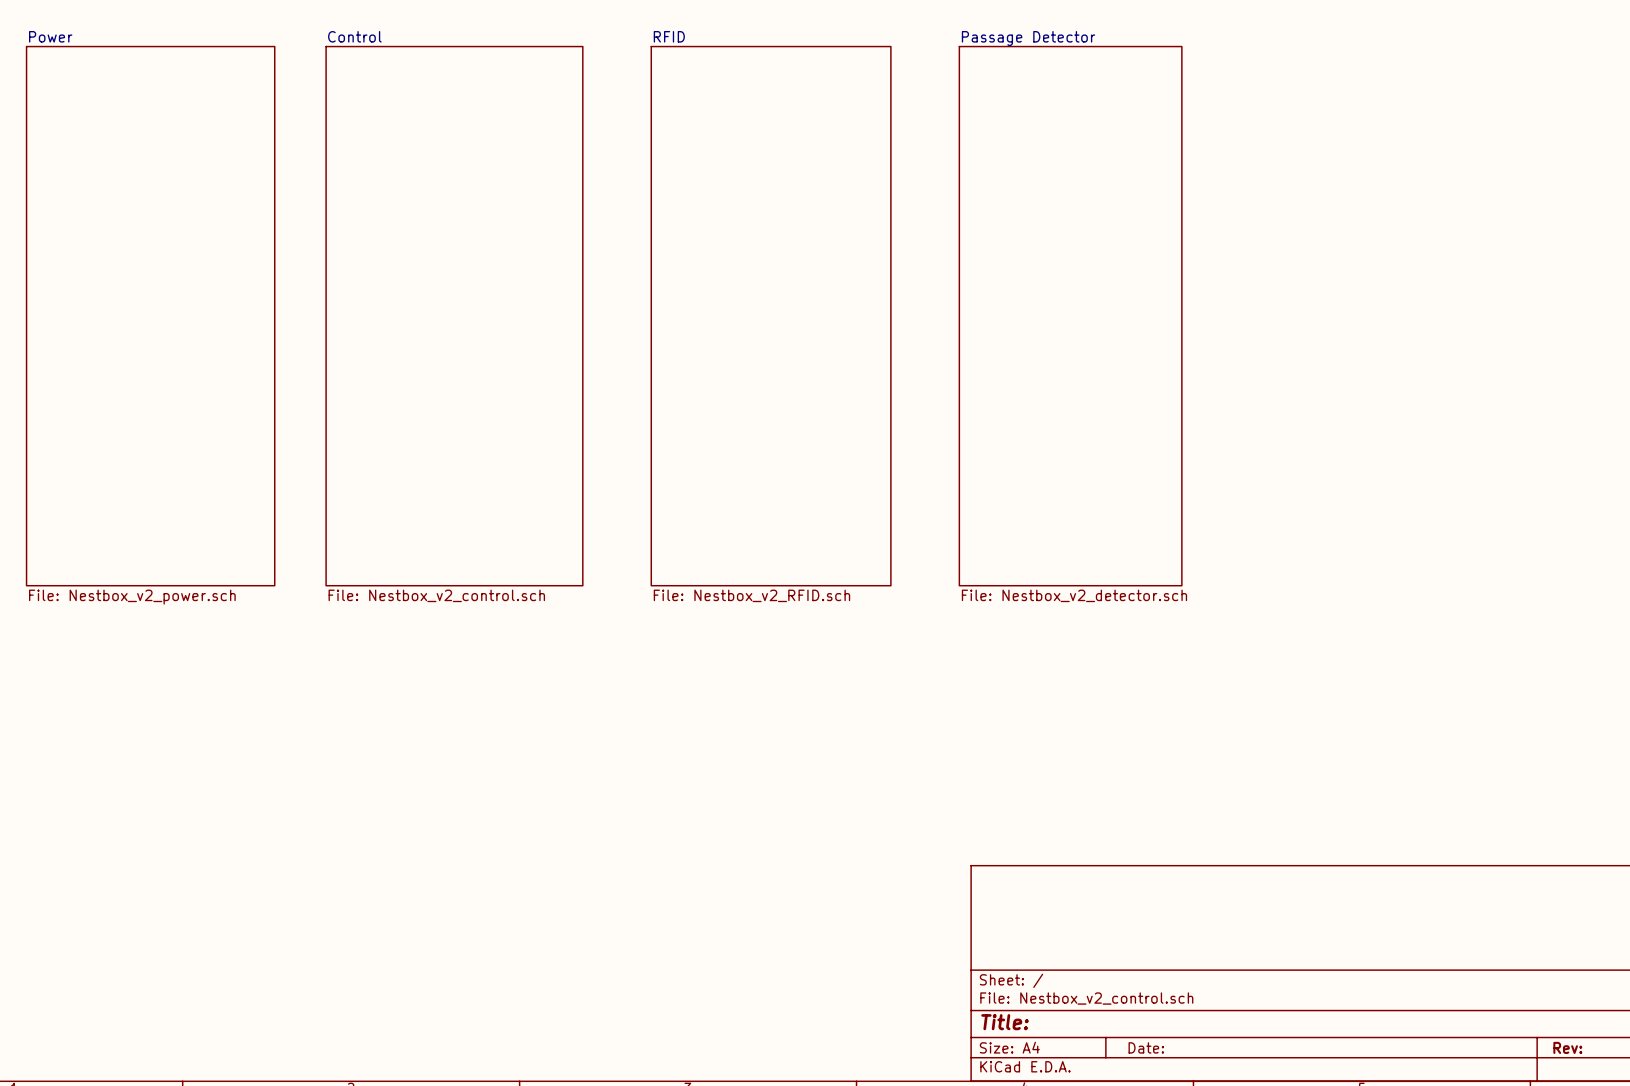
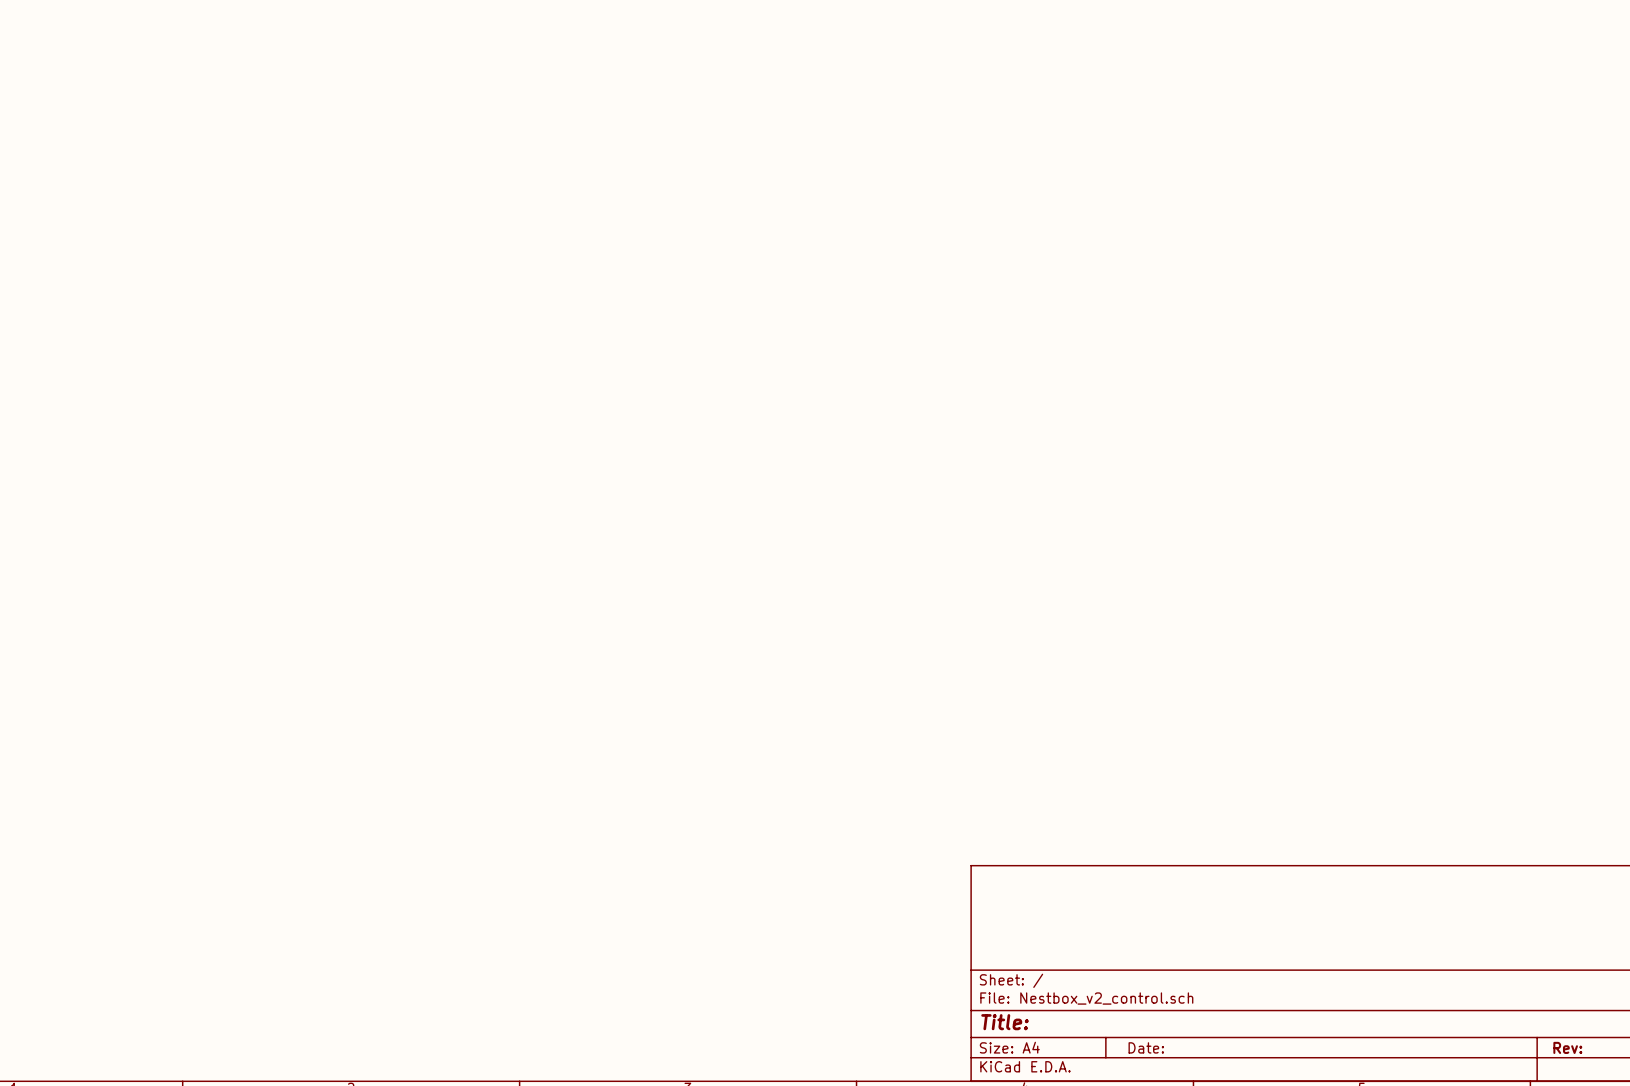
sheet Power: File: Nestbox_v2_power.sch (150, 316) -> none
sheet Control: File: Nestbox_v2_control.sch (454, 316) -> none
sheet RFID: File: Nestbox_v2_RFID.sch (771, 316) -> none
sheet Passage Detector: File: Nestbox_v2_detector.sch (1070, 316) -> none

